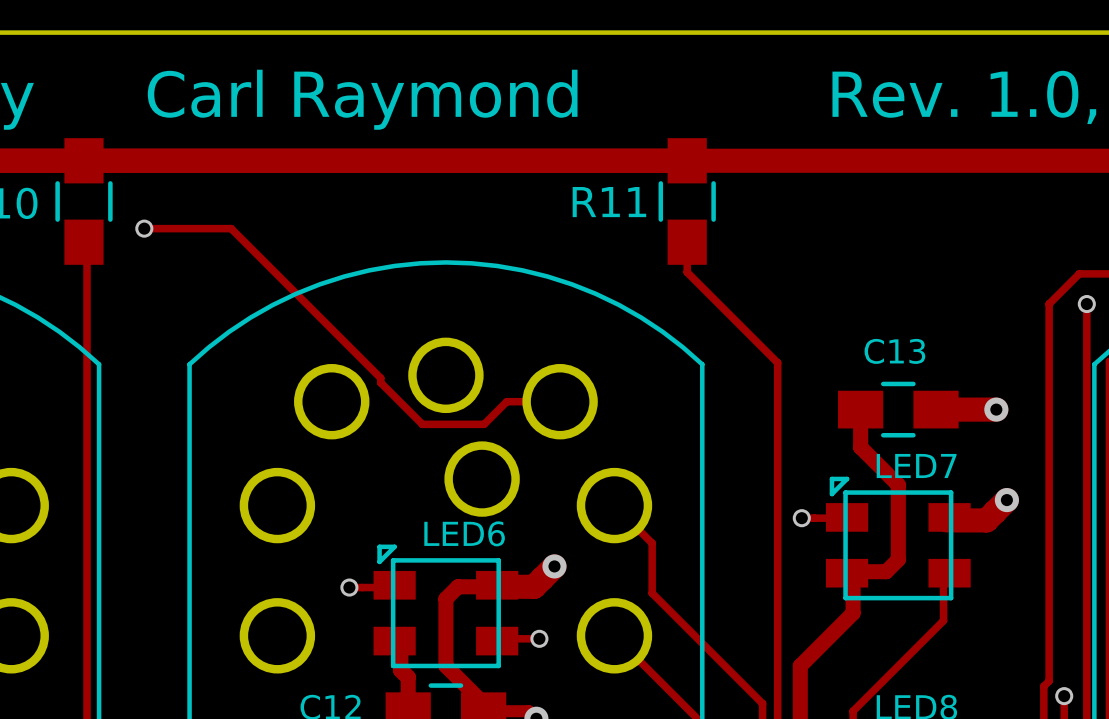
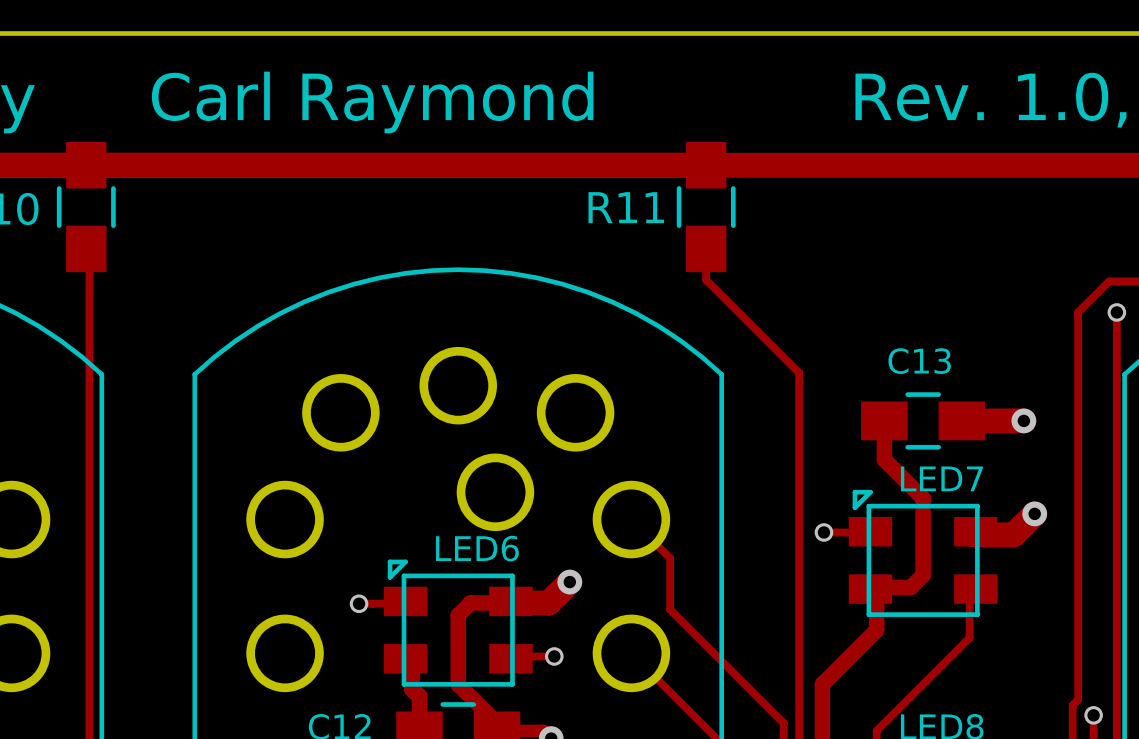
track: (144, 228) (231, 228) (380, 378) (380, 382) (422, 424) (484, 424) (506, 401) (560, 401) -> none
via: (144, 228) -> none

